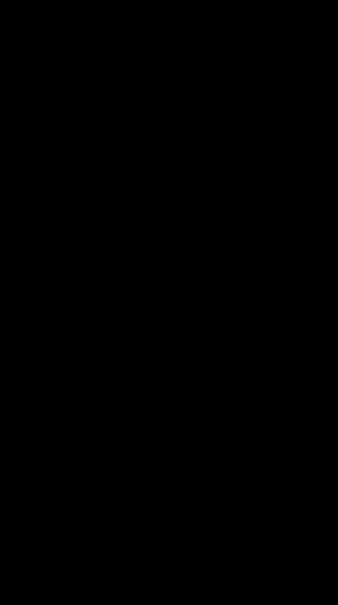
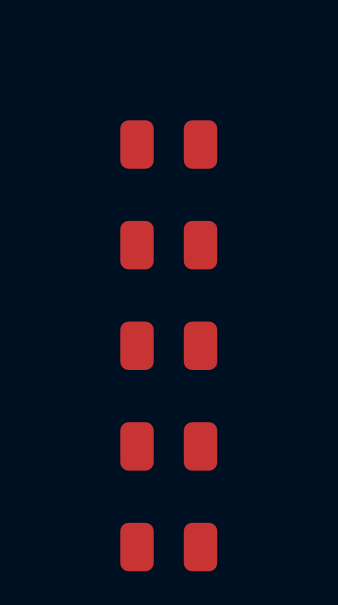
part: none -> (168, 144)
part: none -> (168, 245)
part: none -> (168, 345)
part: none -> (168, 446)
part: none -> (168, 547)

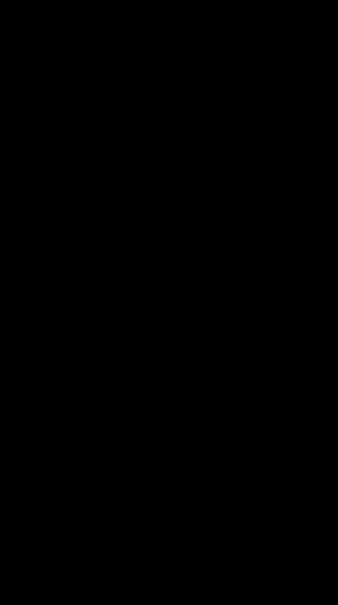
part: (168, 144) -> none
part: (168, 245) -> none
part: (168, 345) -> none
part: (168, 446) -> none
part: (168, 547) -> none

